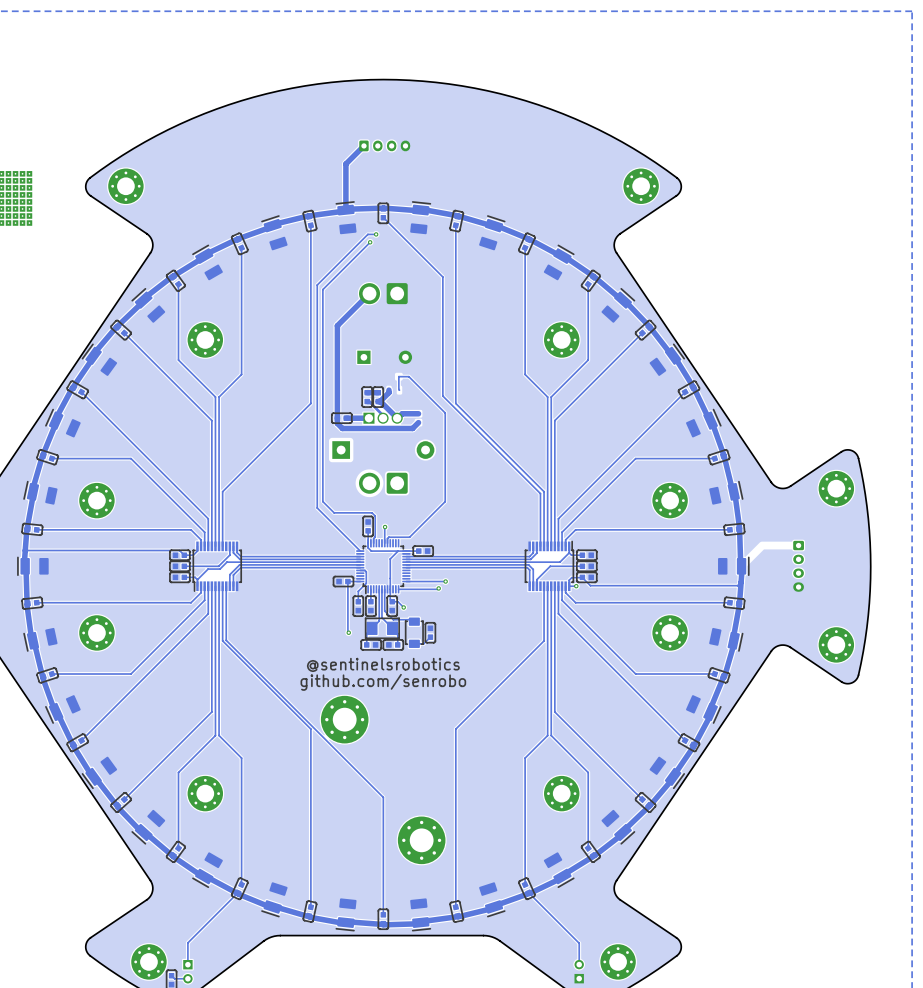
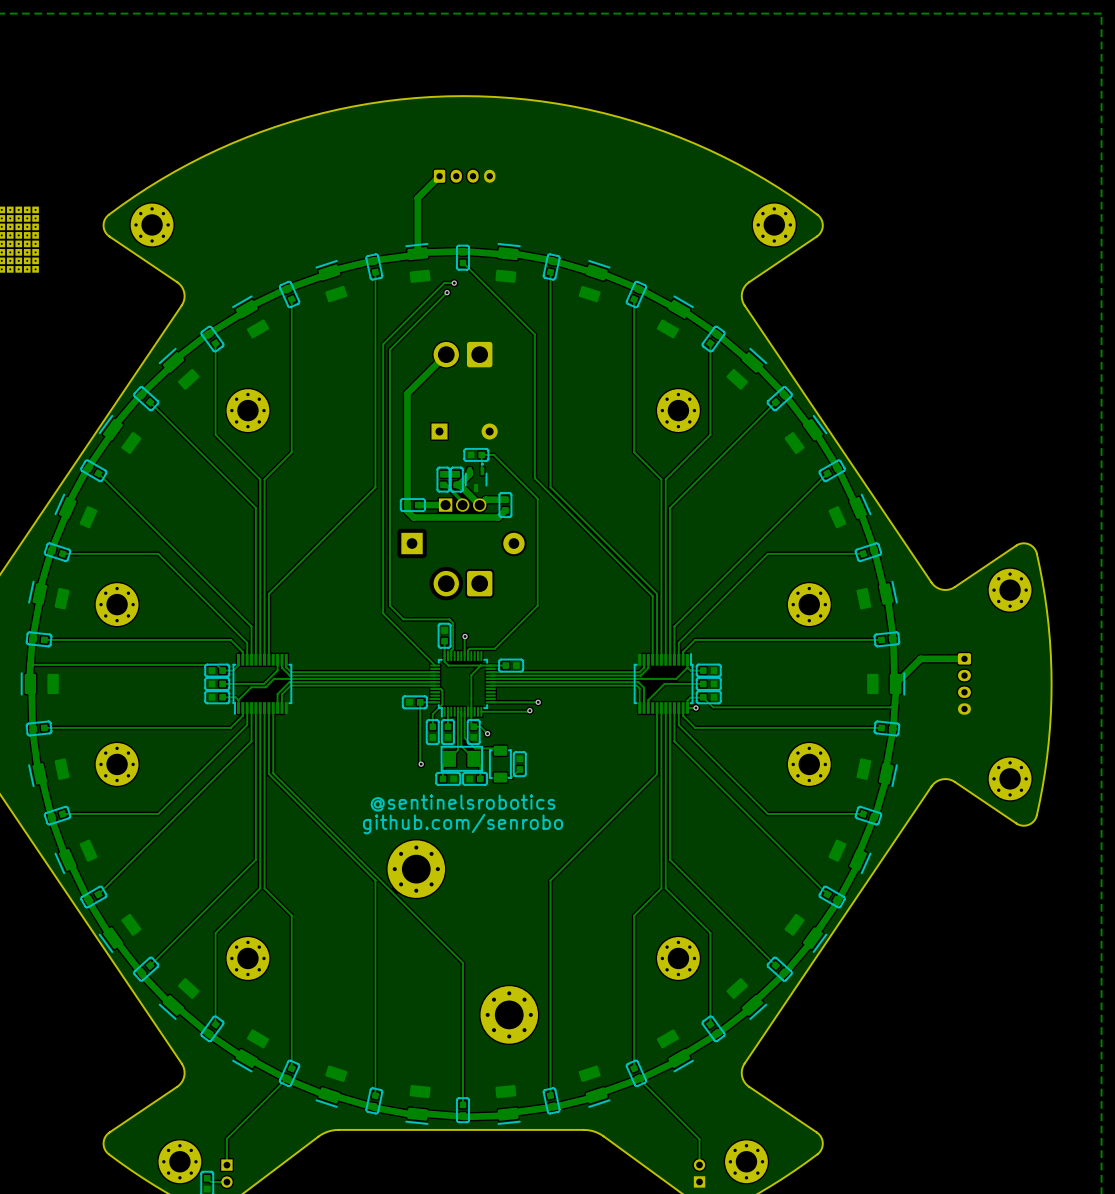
part: none -> (476, 454)
part: none -> (476, 477)
part: none -> (505, 505)
track: none -> (964, 658) (920, 658) (895, 683)

